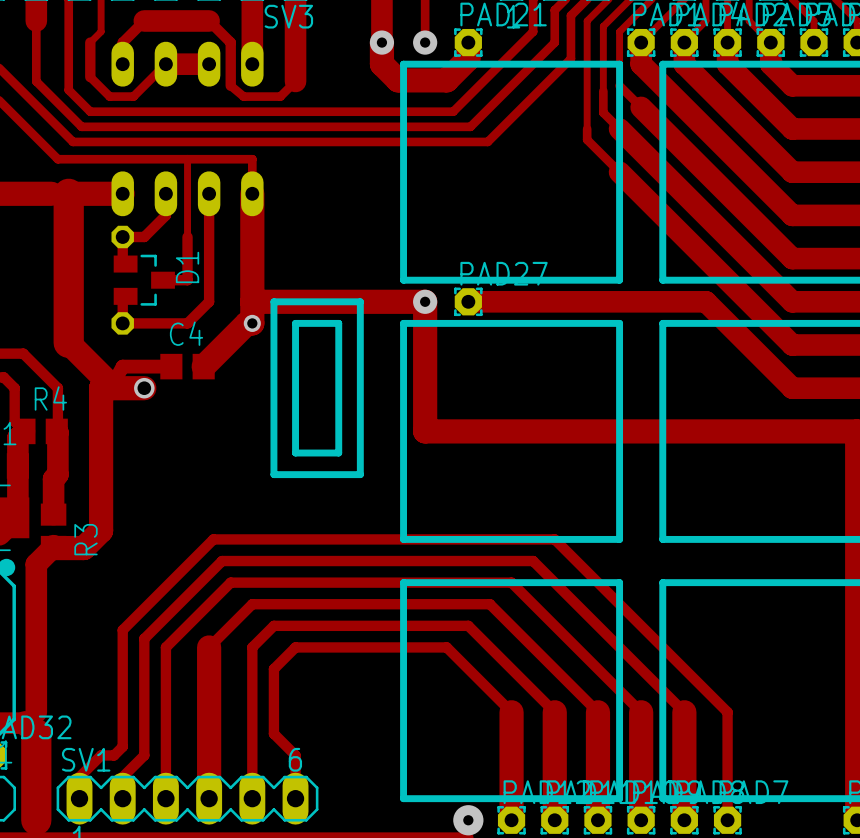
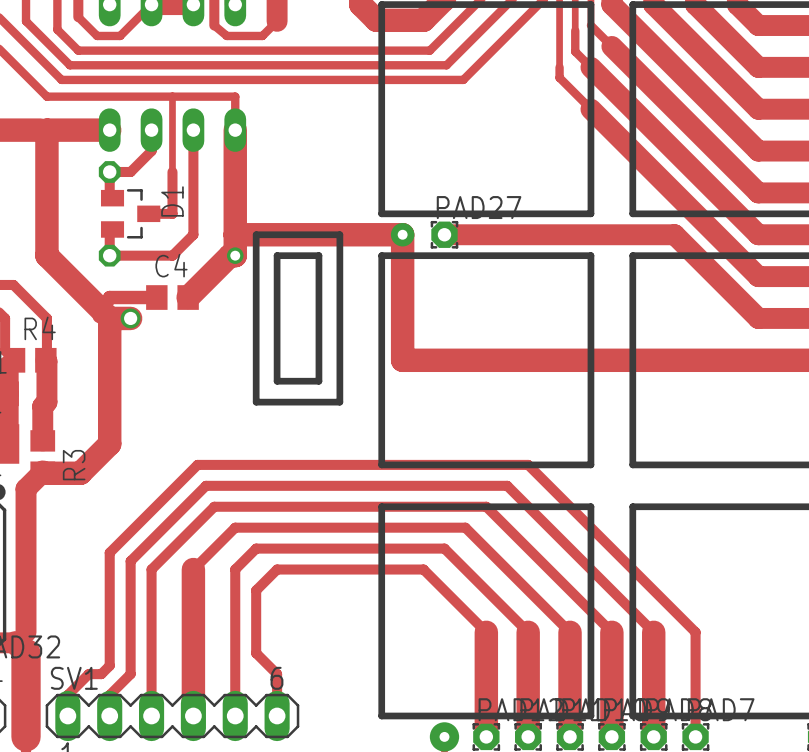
track: (68, 193) (68, 342) (111, 386) (101, 388) -> none
track: (101, 388) (101, 530) (83, 548) -> (46, 130) (46, 255) (109, 318) (109, 443) (80, 473) (72, 473)

